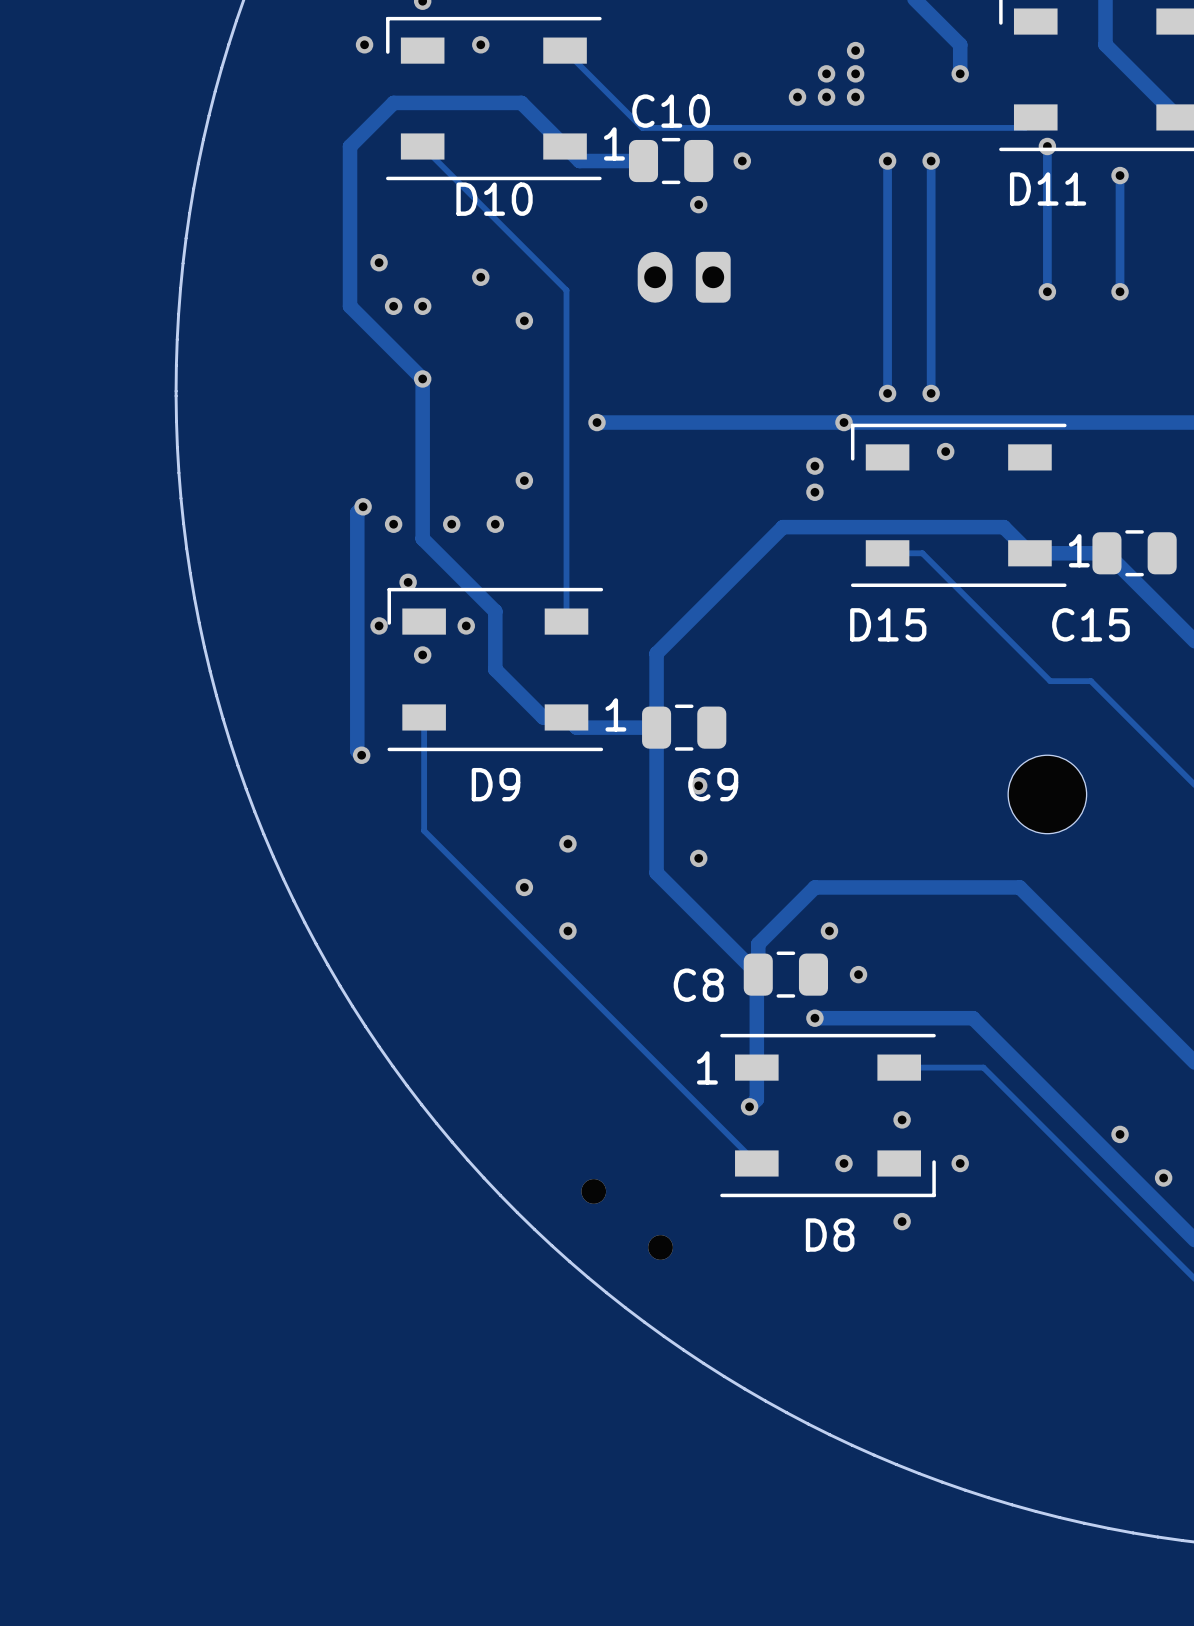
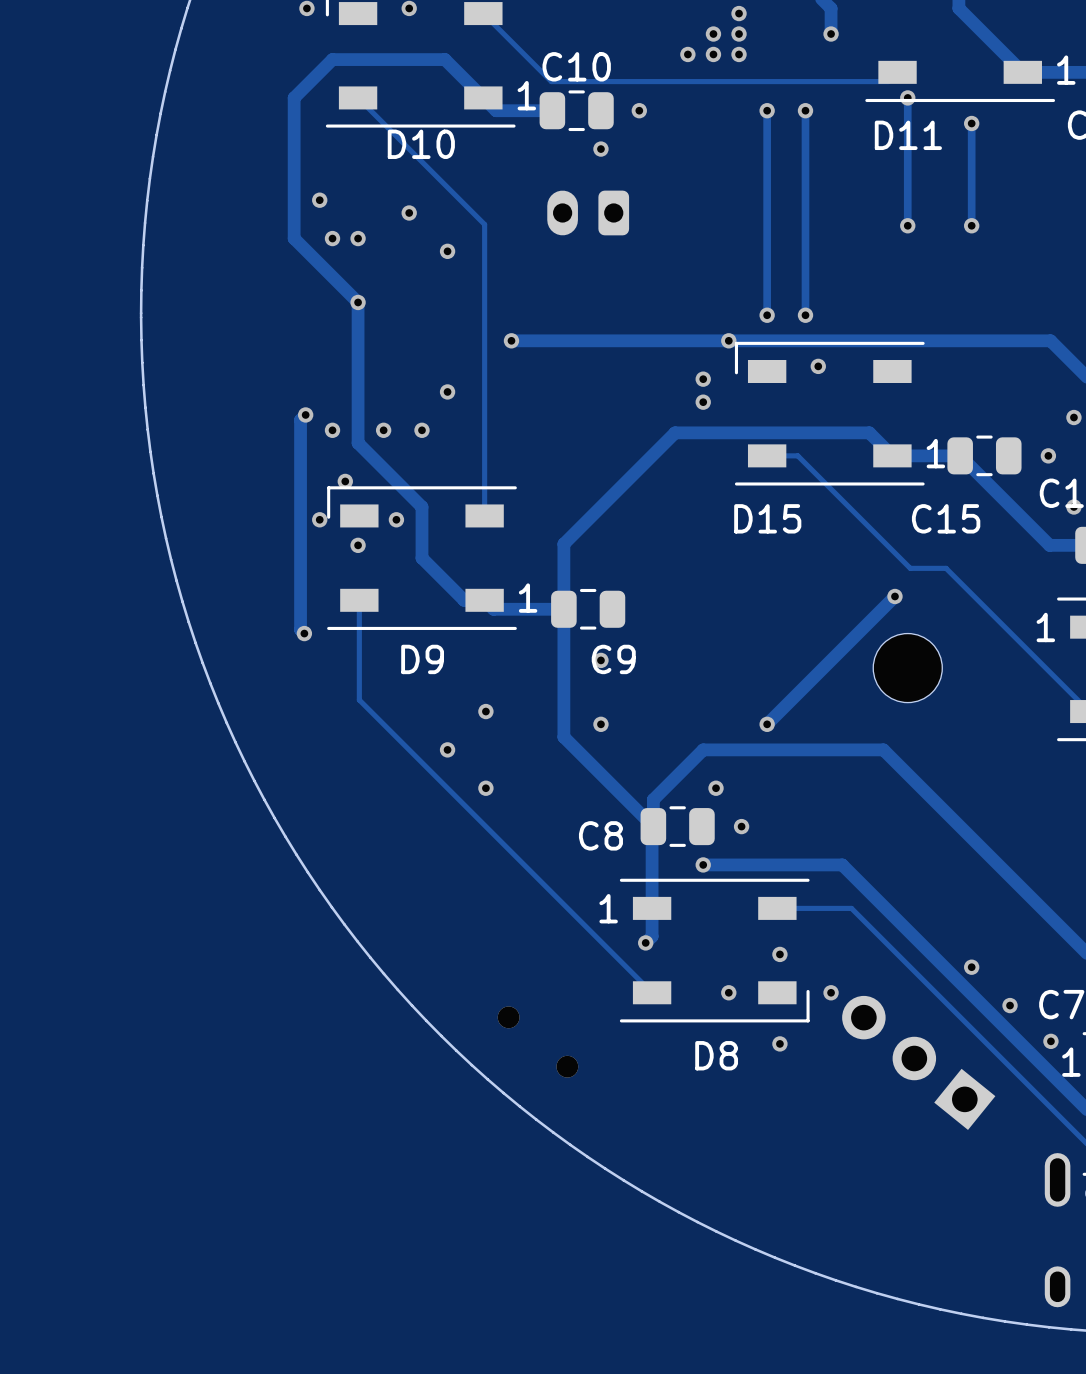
track: none -> (894, 596) (767, 724)
via: none -> (894, 596)
via: none -> (767, 724)
part: none -> (918, 1062)

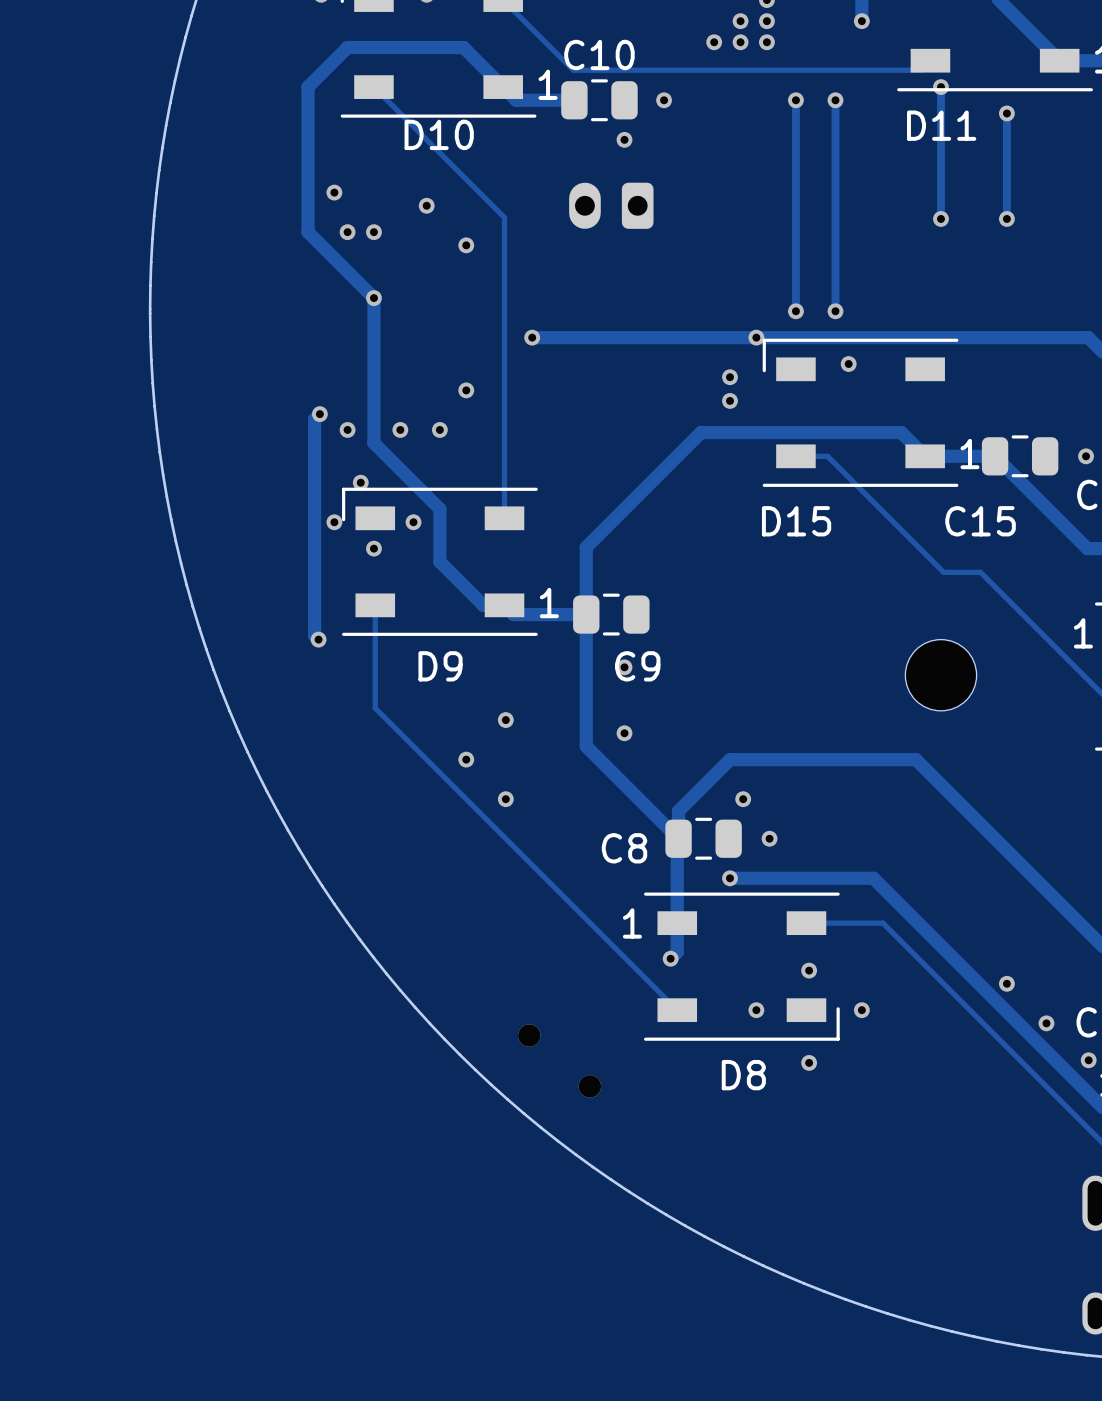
track: (894, 596) (767, 724) -> none
via: (894, 596) -> none
via: (767, 724) -> none
part: (918, 1062) -> none

